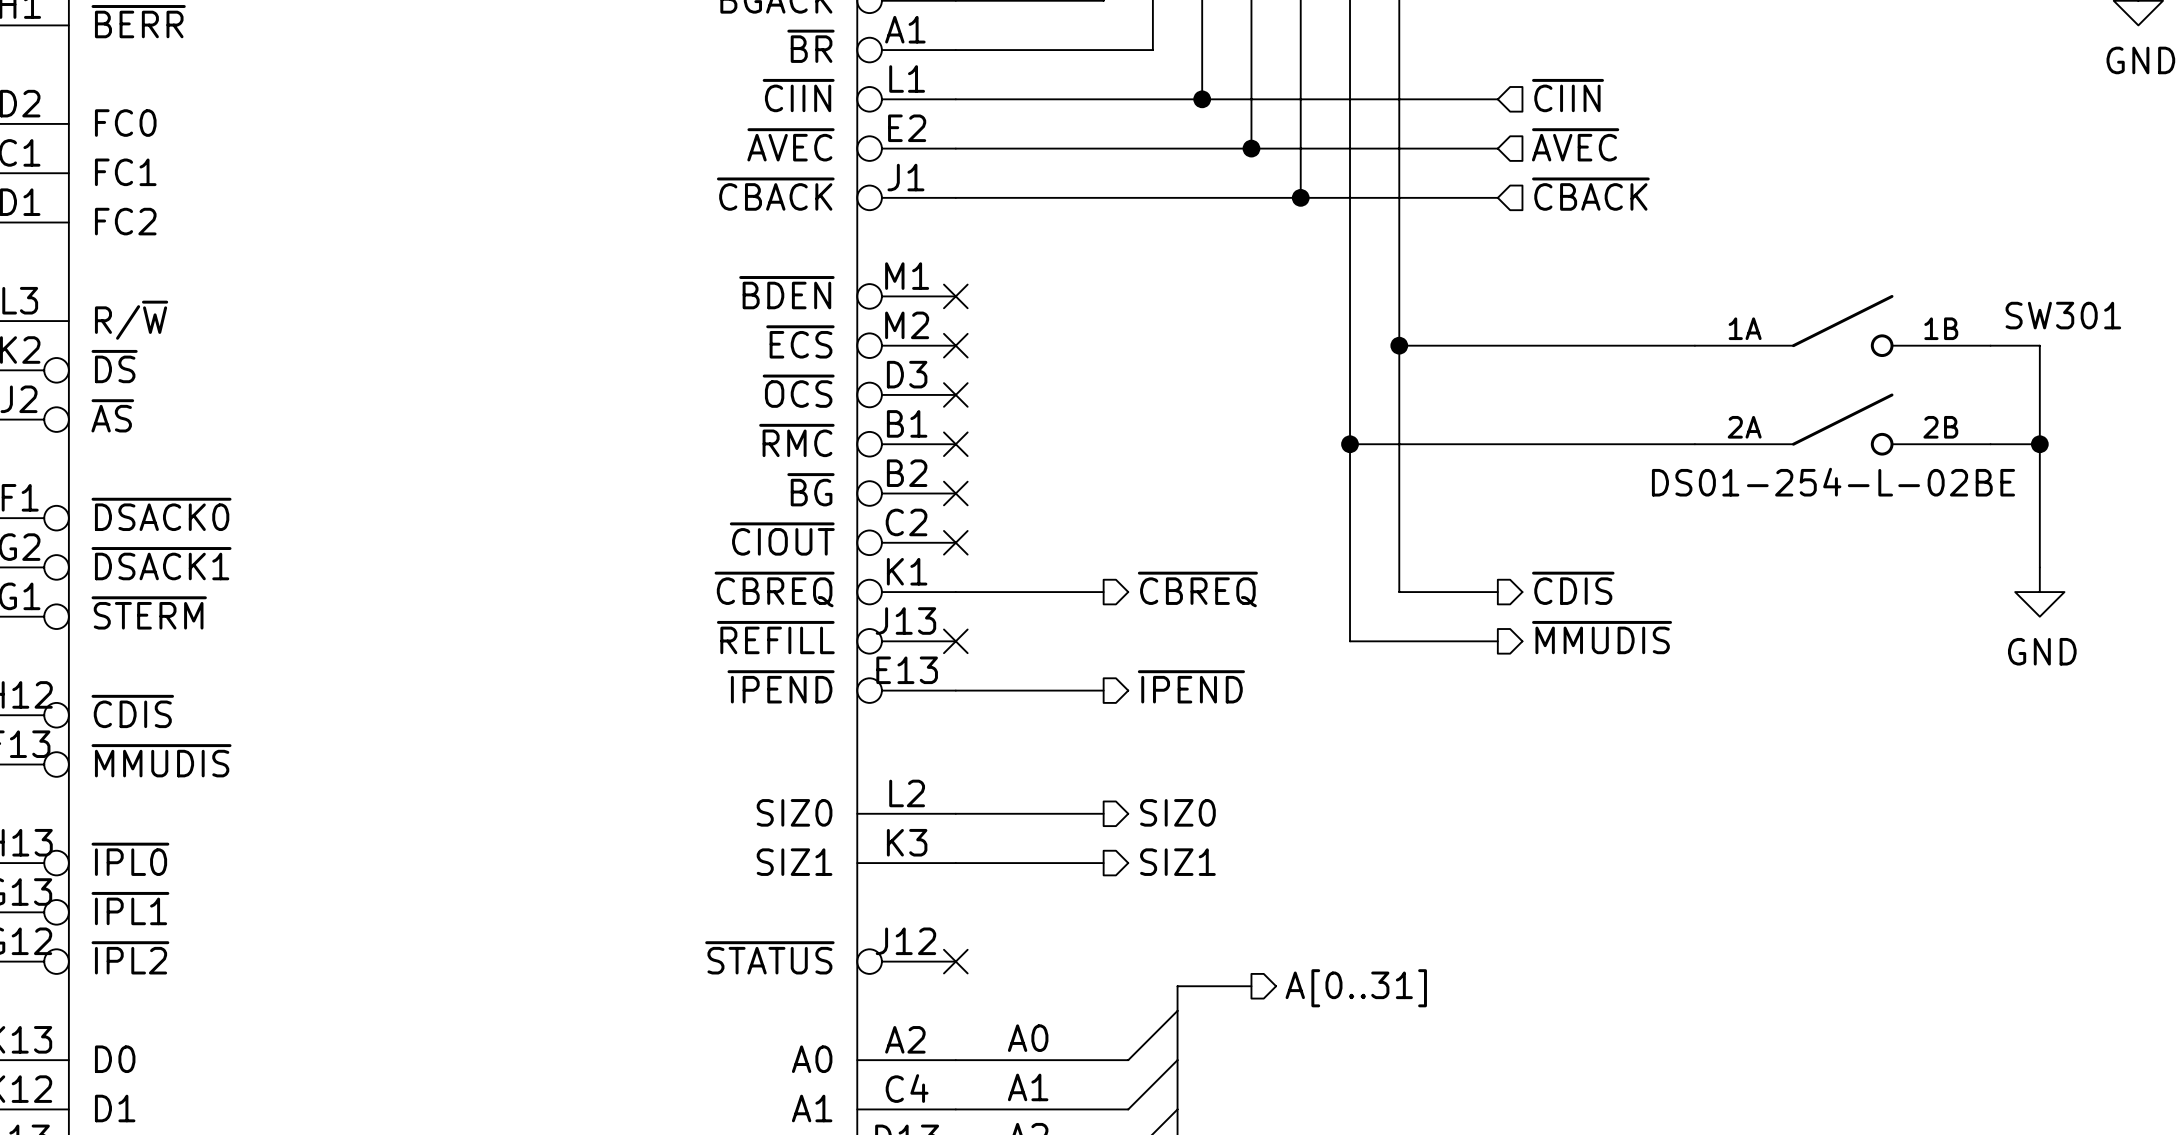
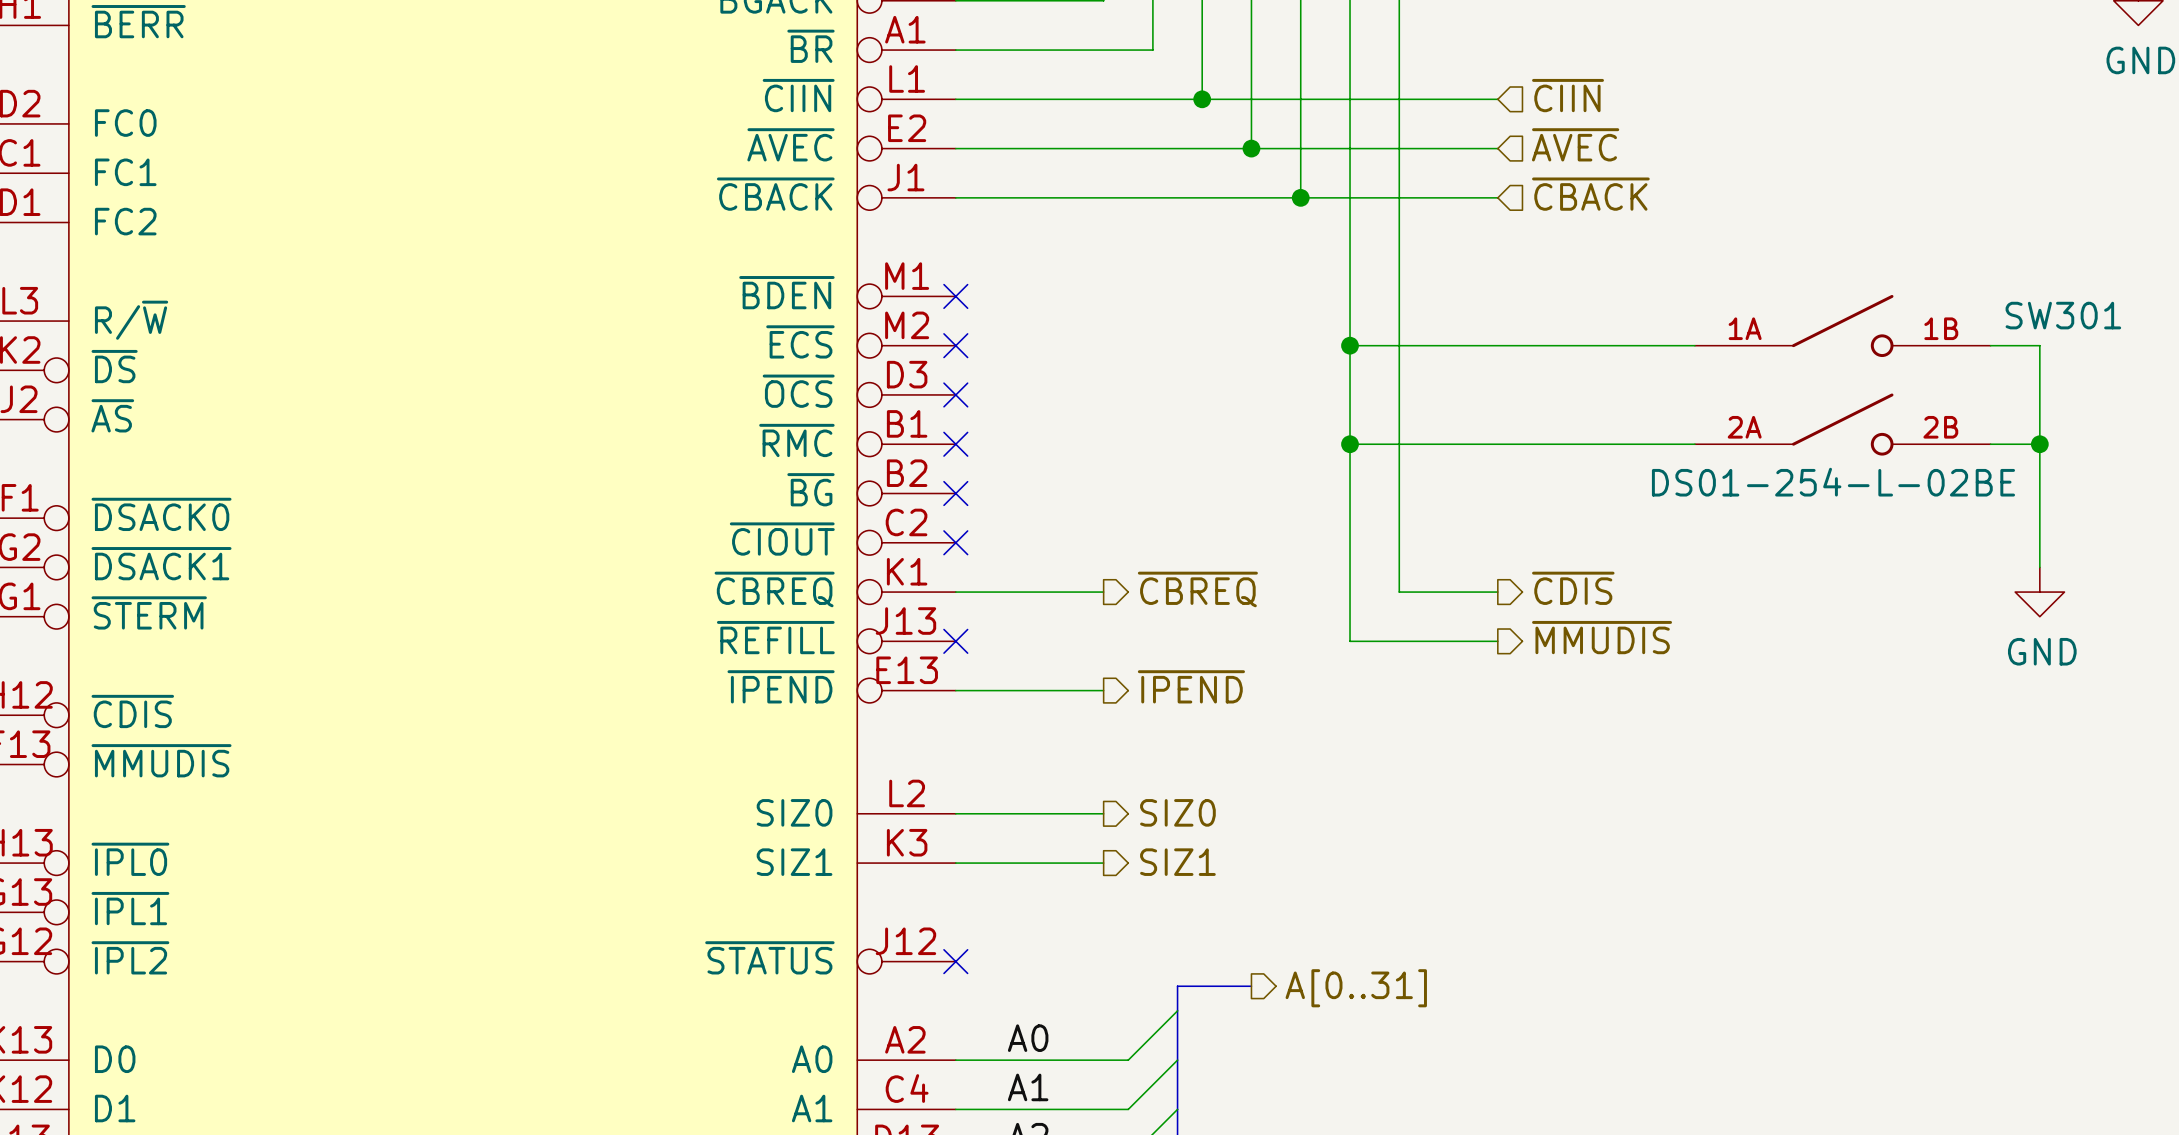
wire: none -> (1350, 345) (1399, 345)
junction position: (1399, 345) -> (1350, 345)

